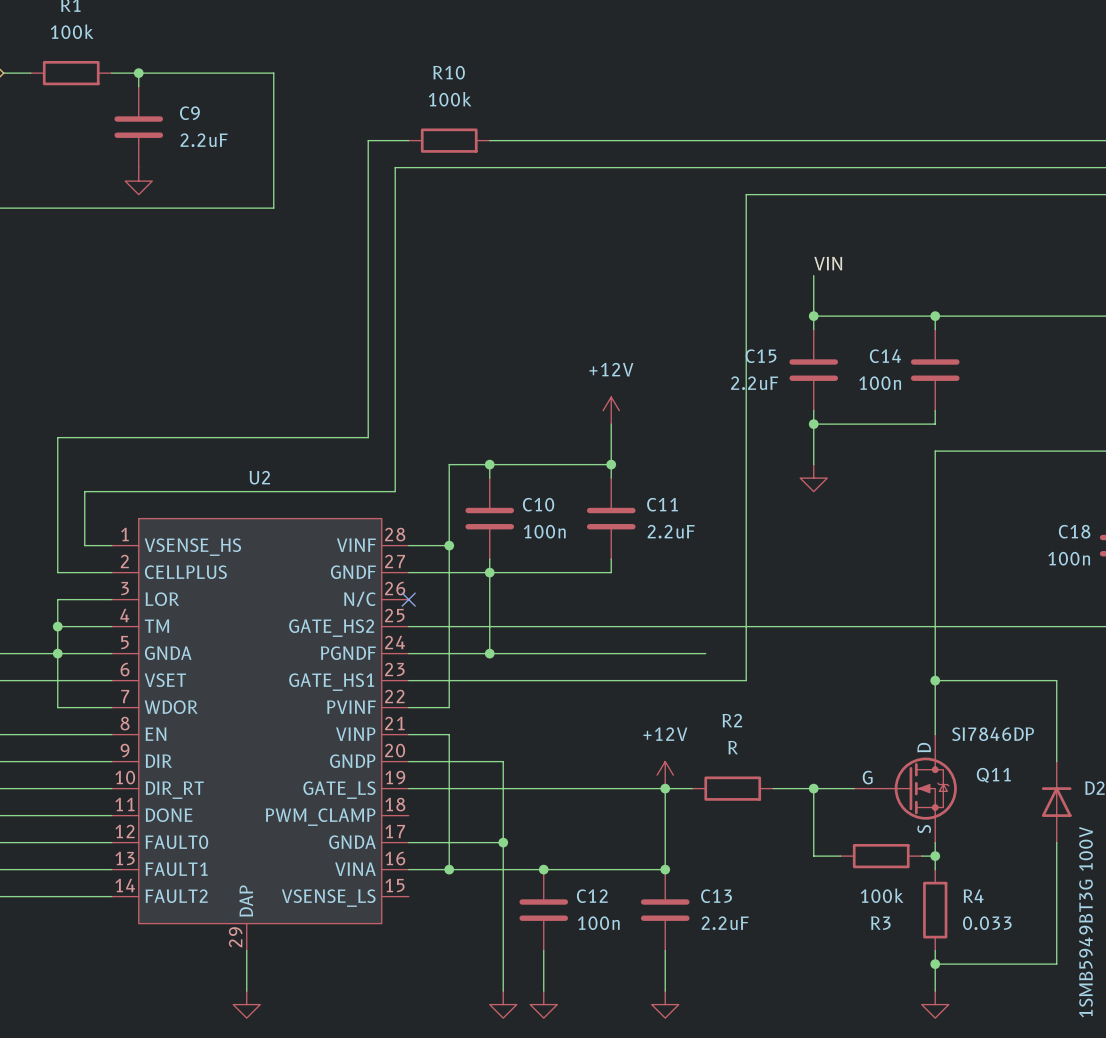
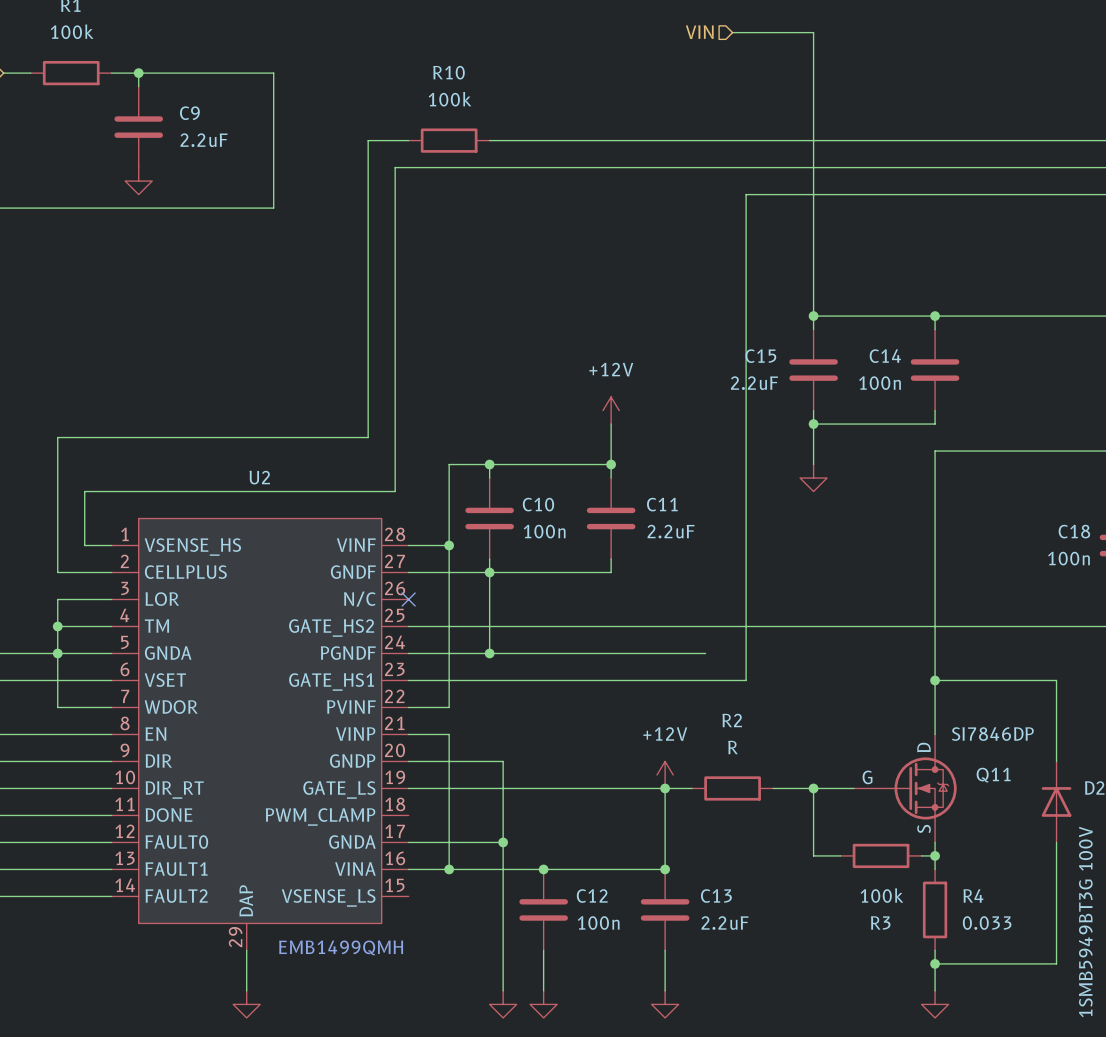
hierarchical label: none -> VIN (699, 32)
wire: none -> (732, 32) (813, 32) (813, 275)
label: VIN (828, 263) -> none
text: none -> EMB1499QMH (341, 947)

